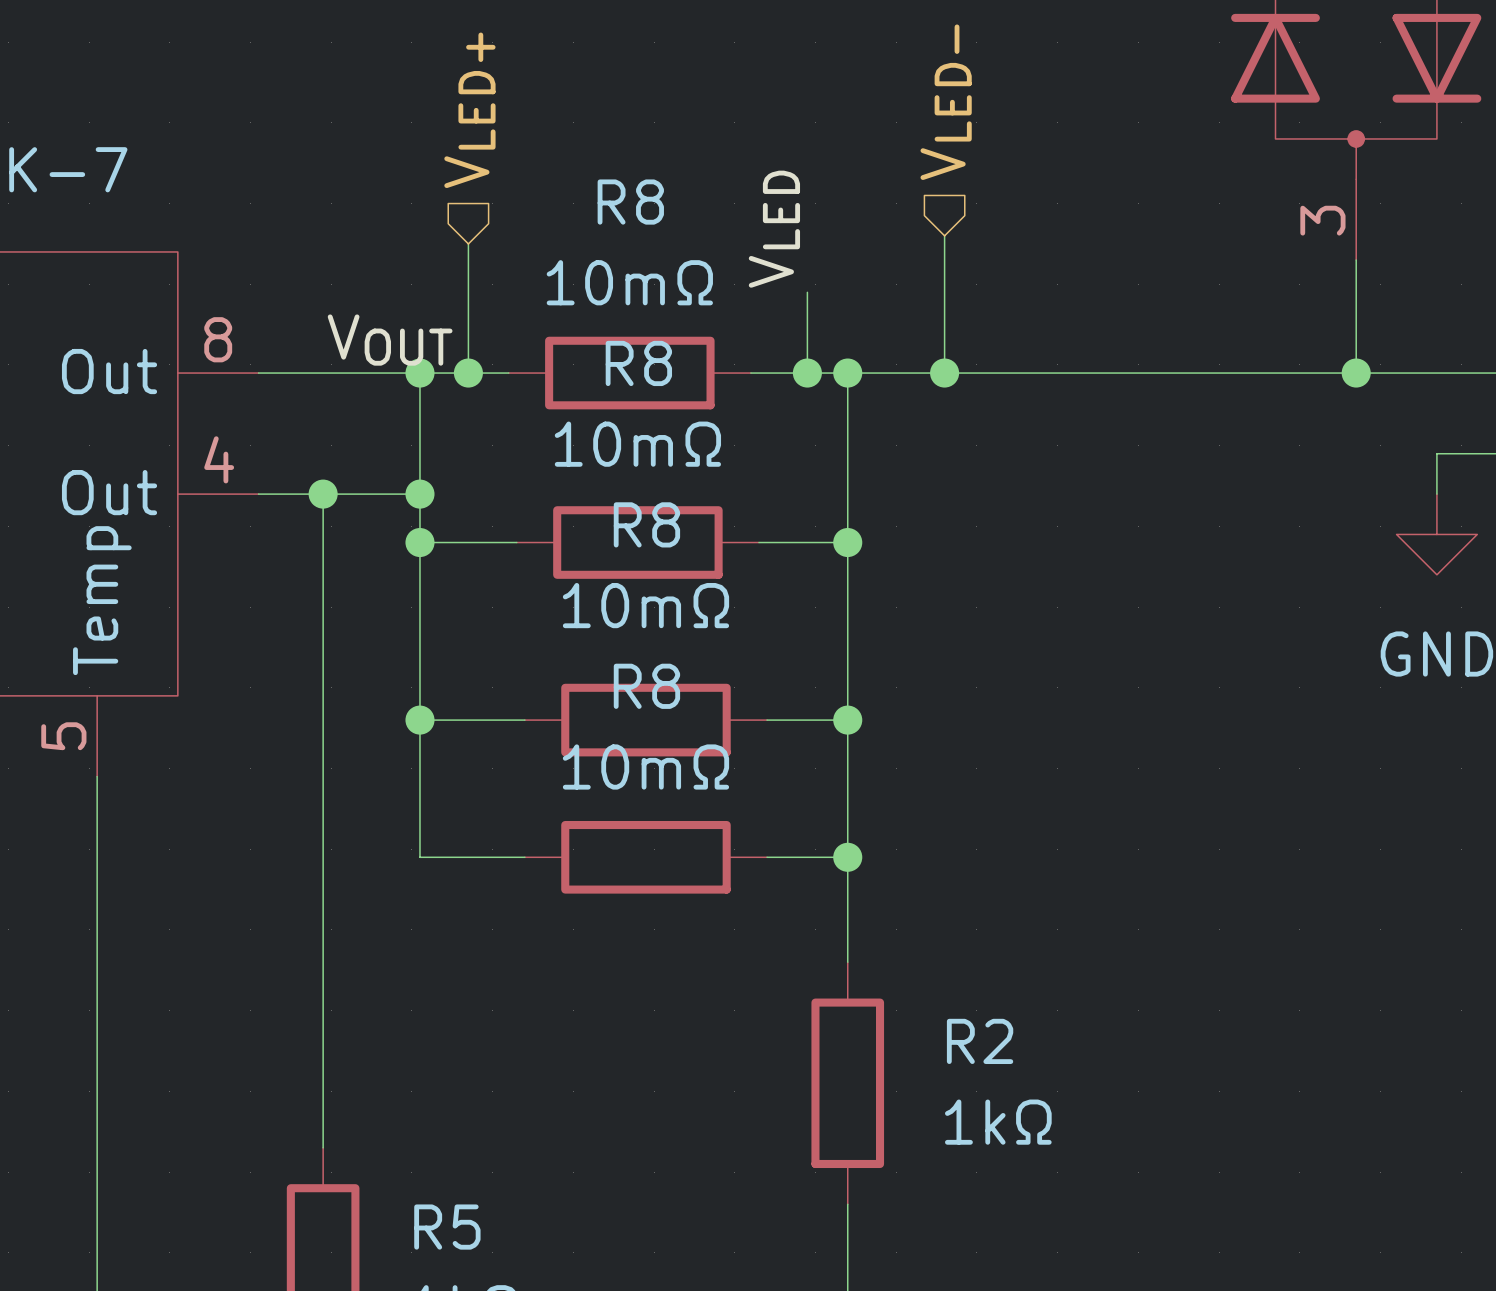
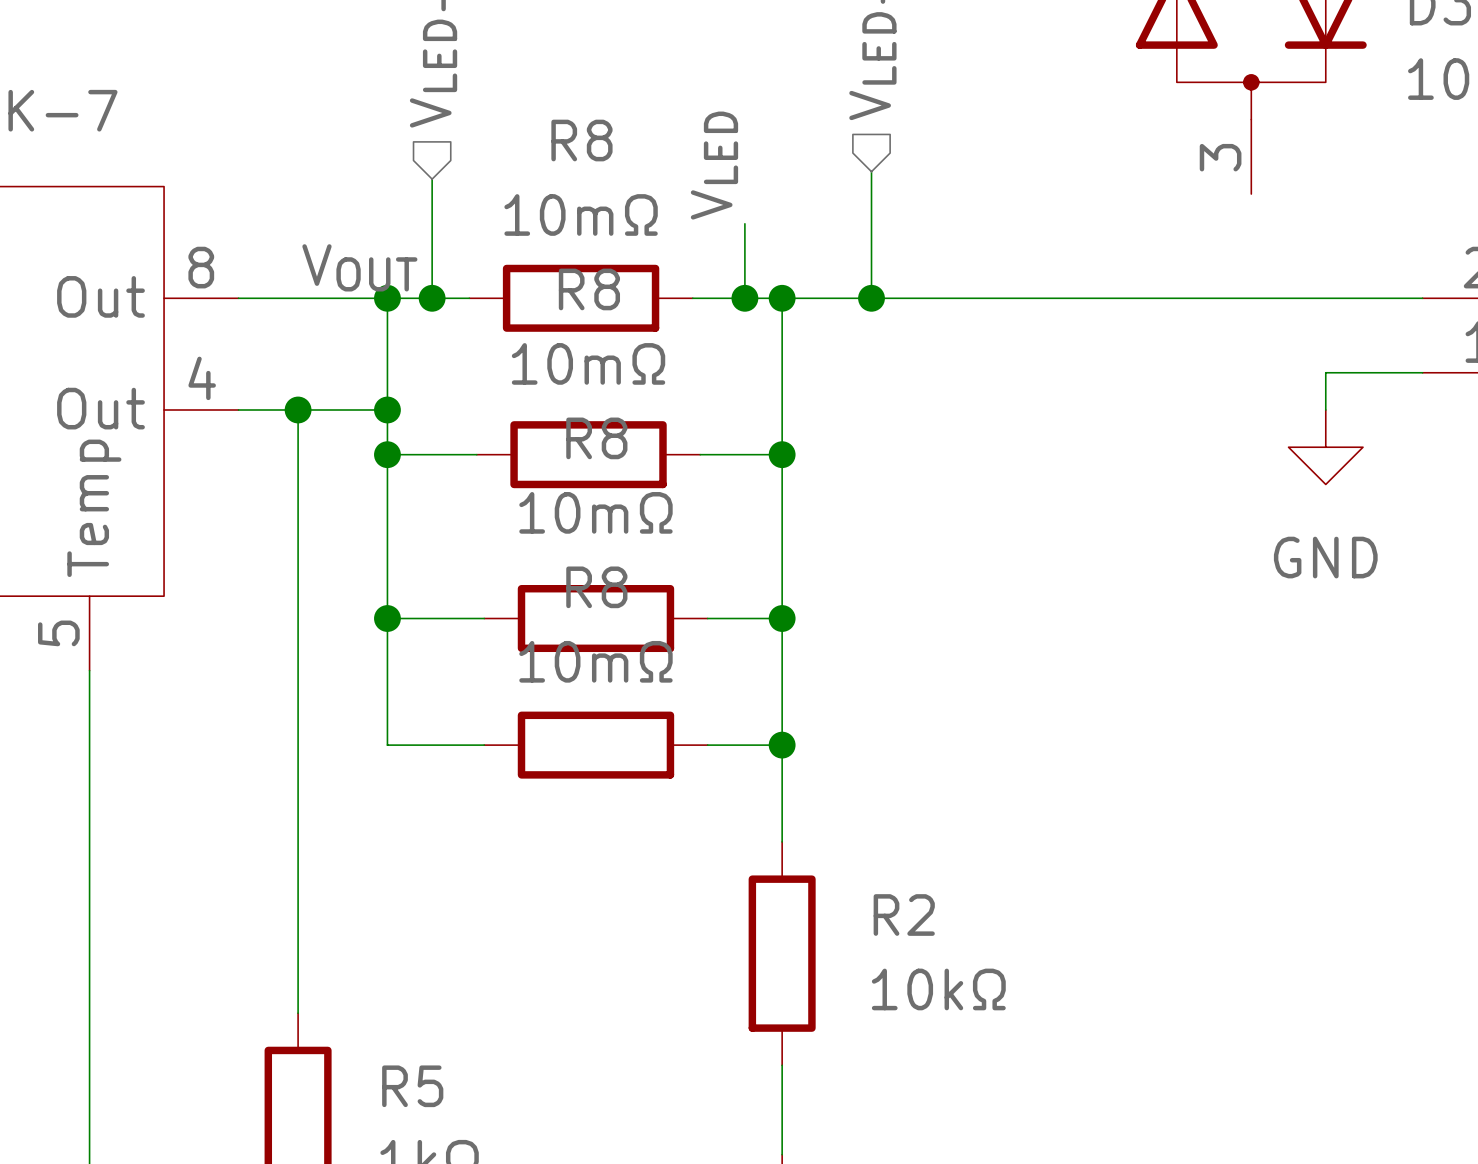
wire: (1356, 260) (1356, 373) -> none
junction: (1356, 373) -> none
R2 value: 1kΩ (998, 1122) -> 10kΩ (938, 989)

